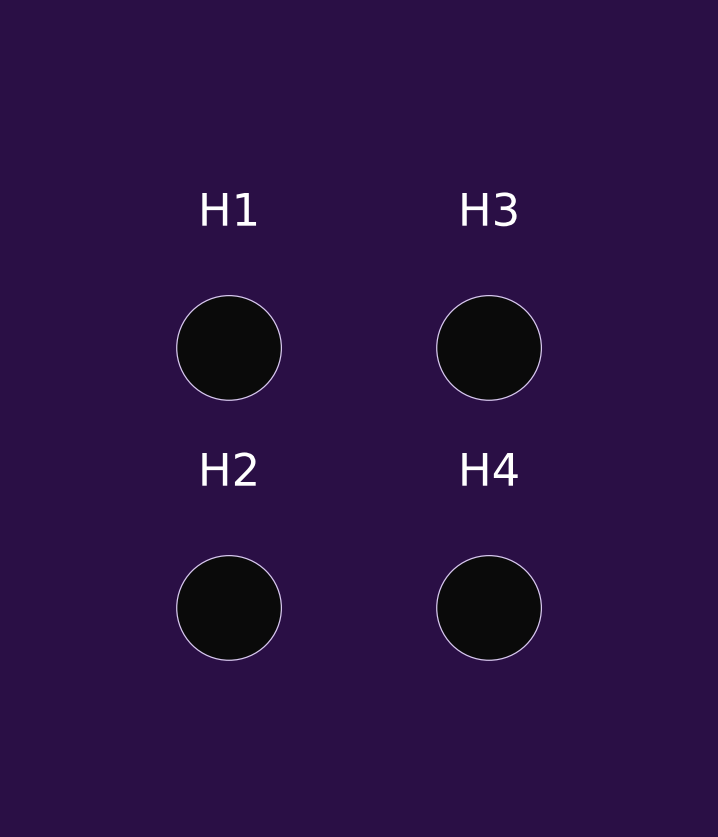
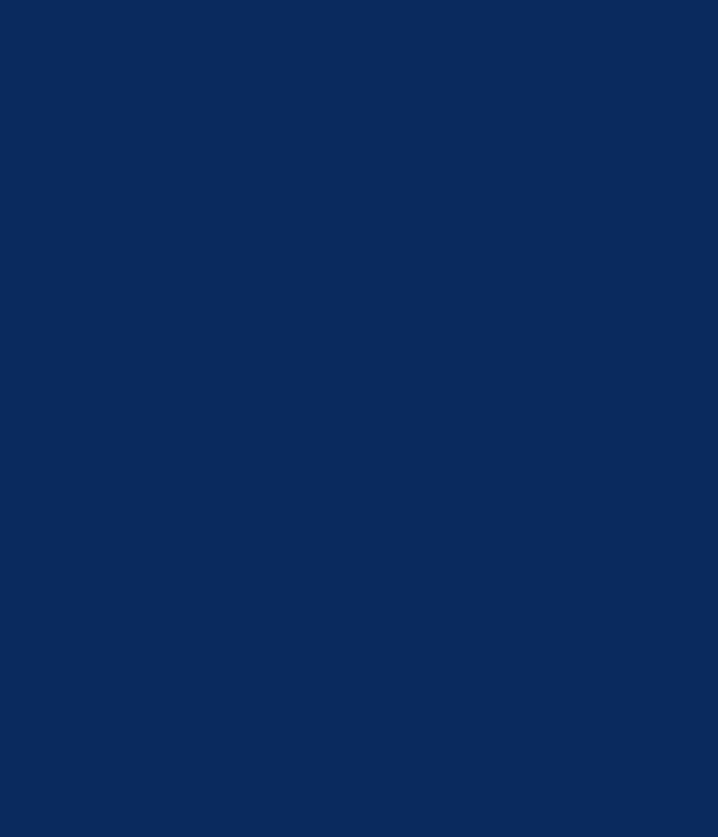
H1: (229, 347) -> none
H3: (489, 347) -> none
H2: (229, 607) -> none
H4: (489, 607) -> none

